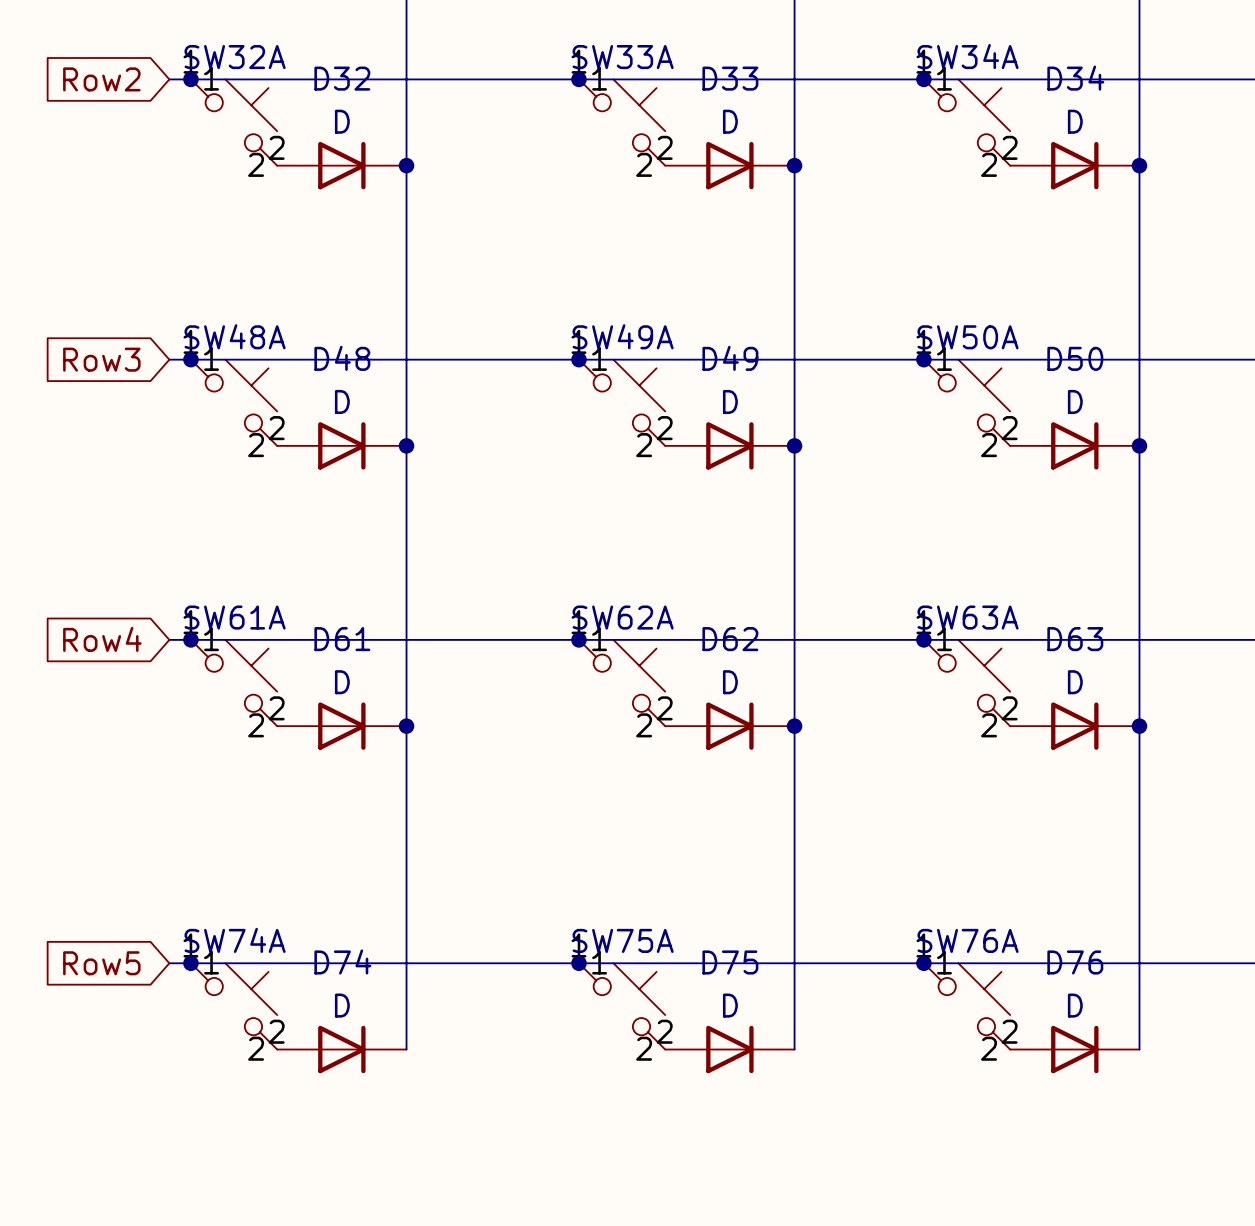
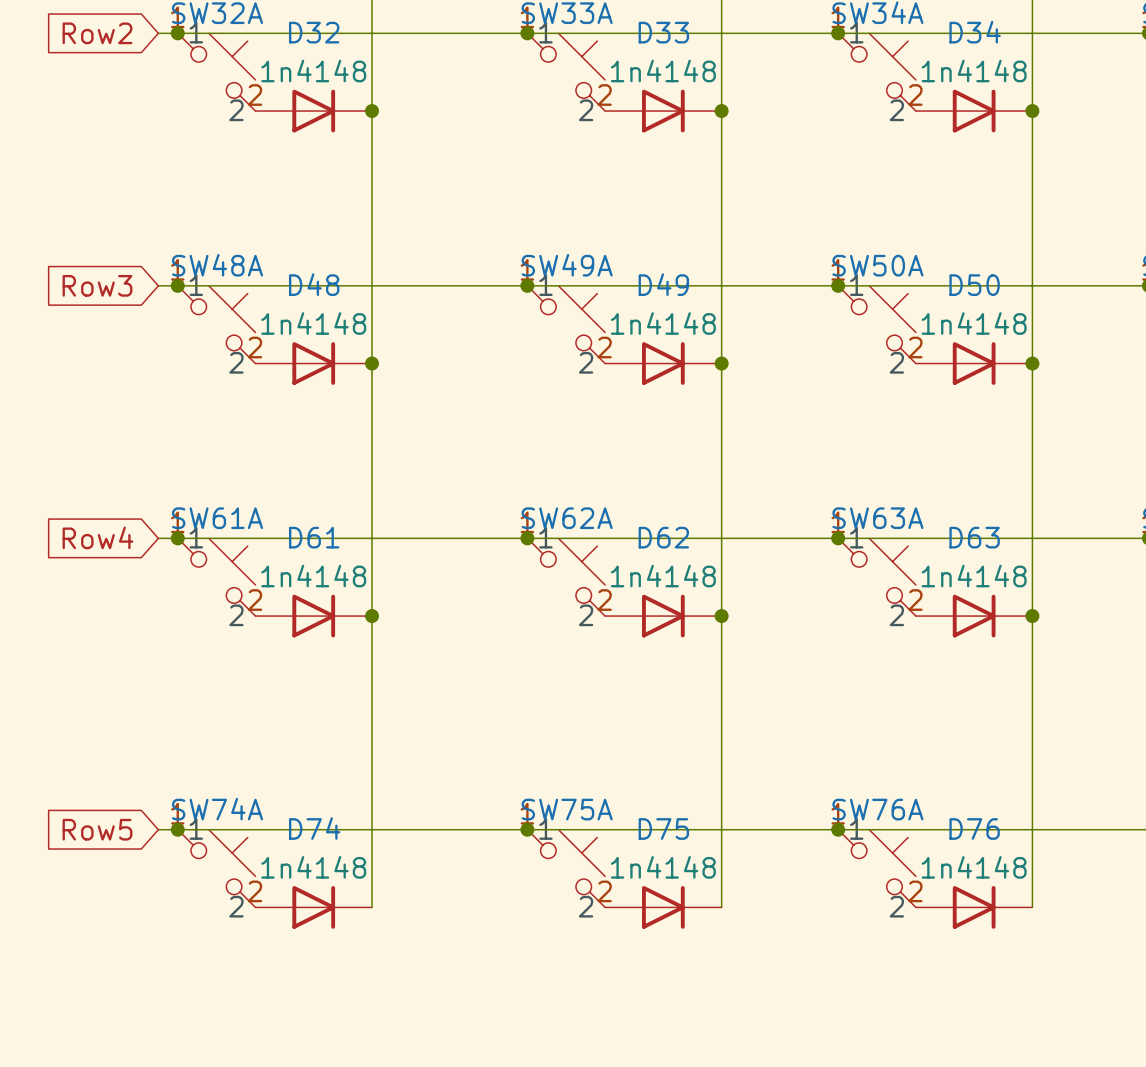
D32 value: D (342, 121) -> 1n4148 (313, 70)
D33 value: D (730, 121) -> 1n4148 (663, 70)
D34 value: D (1075, 121) -> 1n4148 (974, 70)
D48 value: D (342, 401) -> 1n4148 (313, 323)
D49 value: D (730, 401) -> 1n4148 (663, 323)
D50 value: D (1075, 401) -> 1n4148 (974, 323)
D61 value: D (342, 682) -> 1n4148 (313, 576)
D62 value: D (730, 682) -> 1n4148 (663, 576)
D63 value: D (1075, 682) -> 1n4148 (974, 576)
D74 value: D (342, 1005) -> 1n4148 (313, 867)
D75 value: D (730, 1005) -> 1n4148 (663, 867)
D76 value: D (1075, 1005) -> 1n4148 (974, 867)

